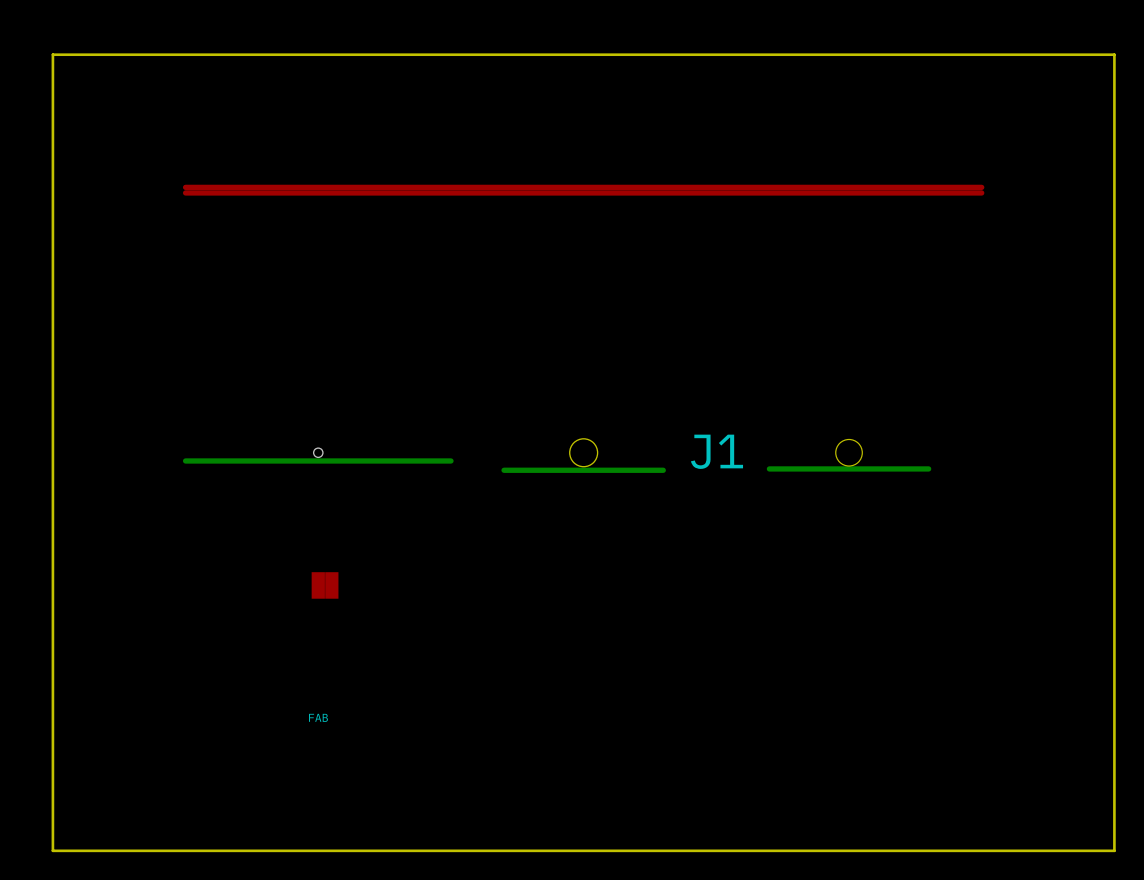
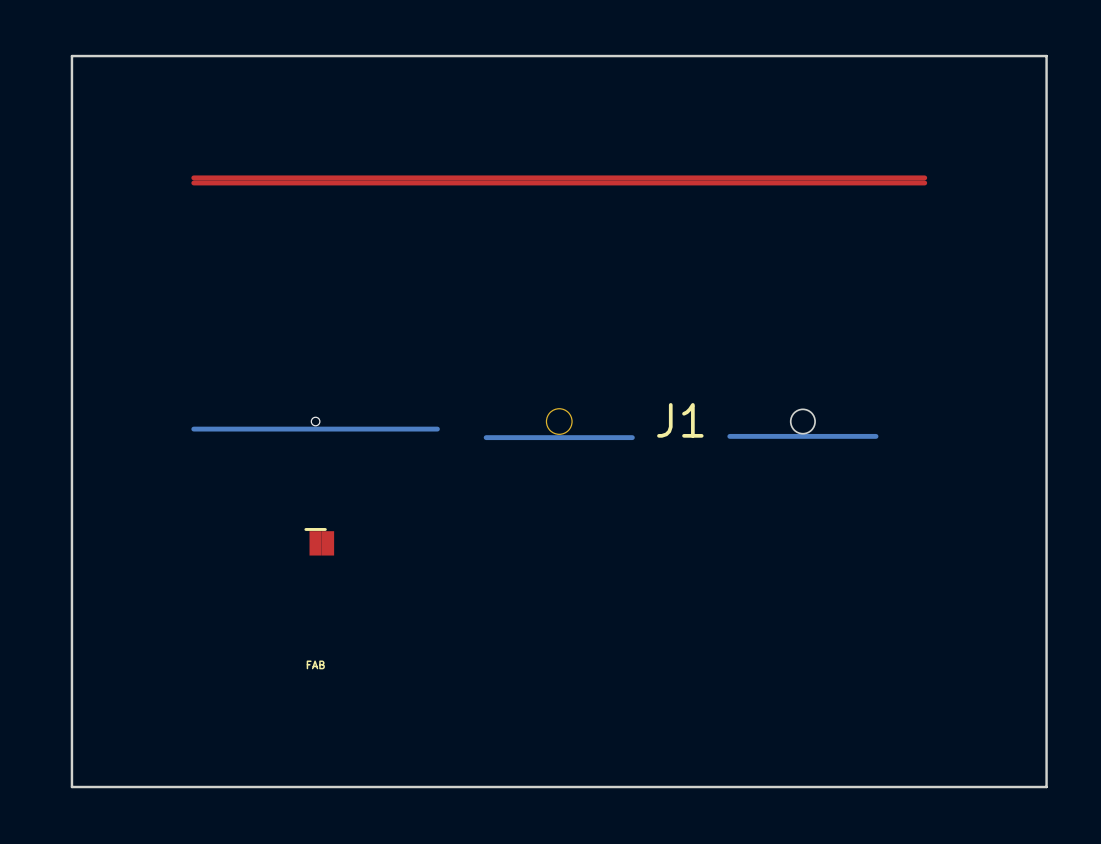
line: none -> (305, 529) (325, 529)

